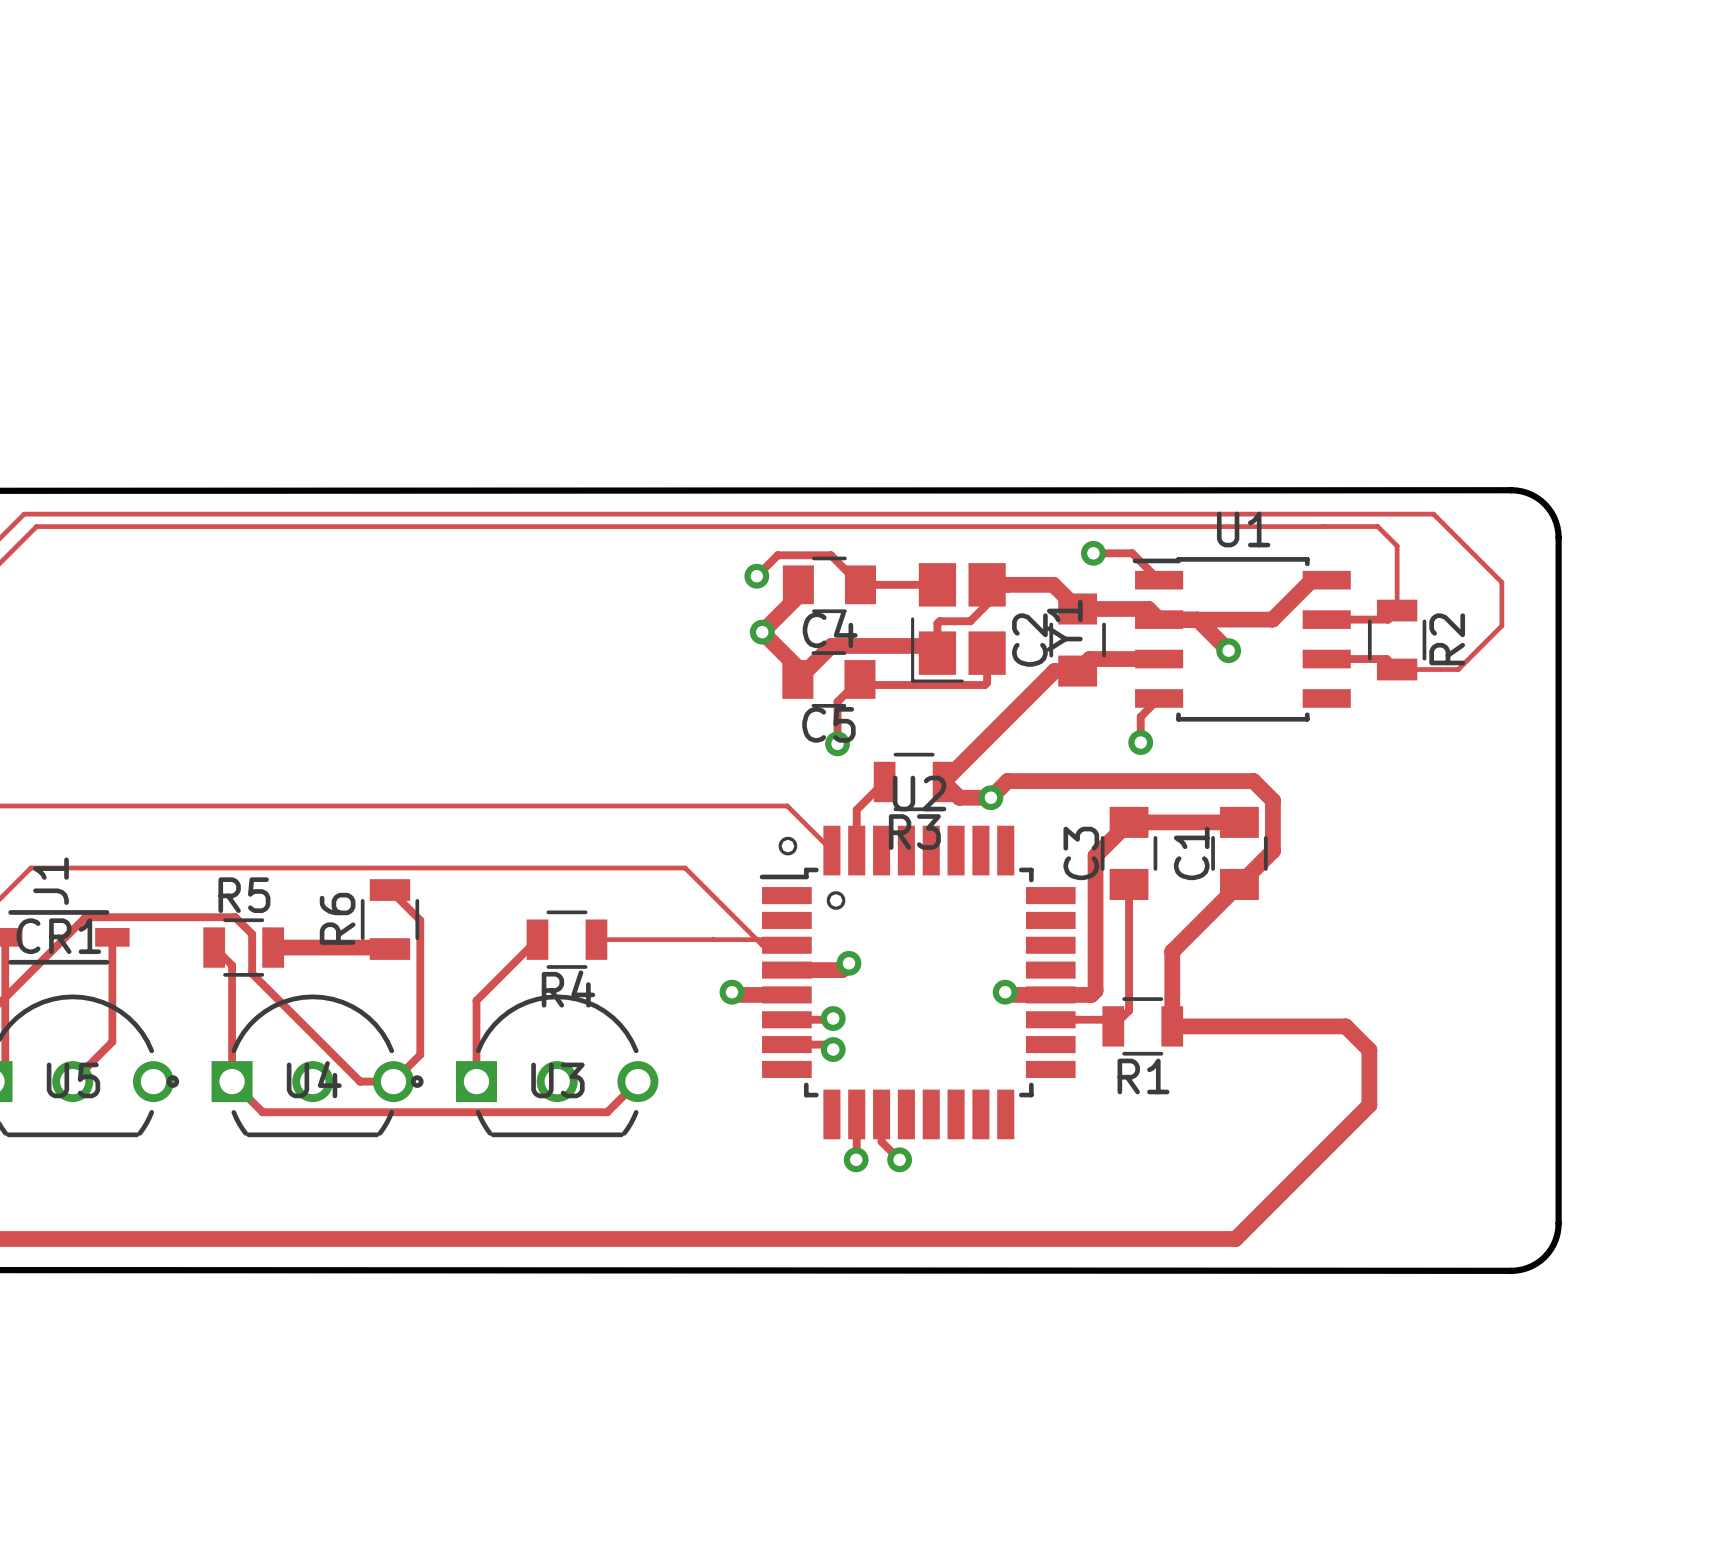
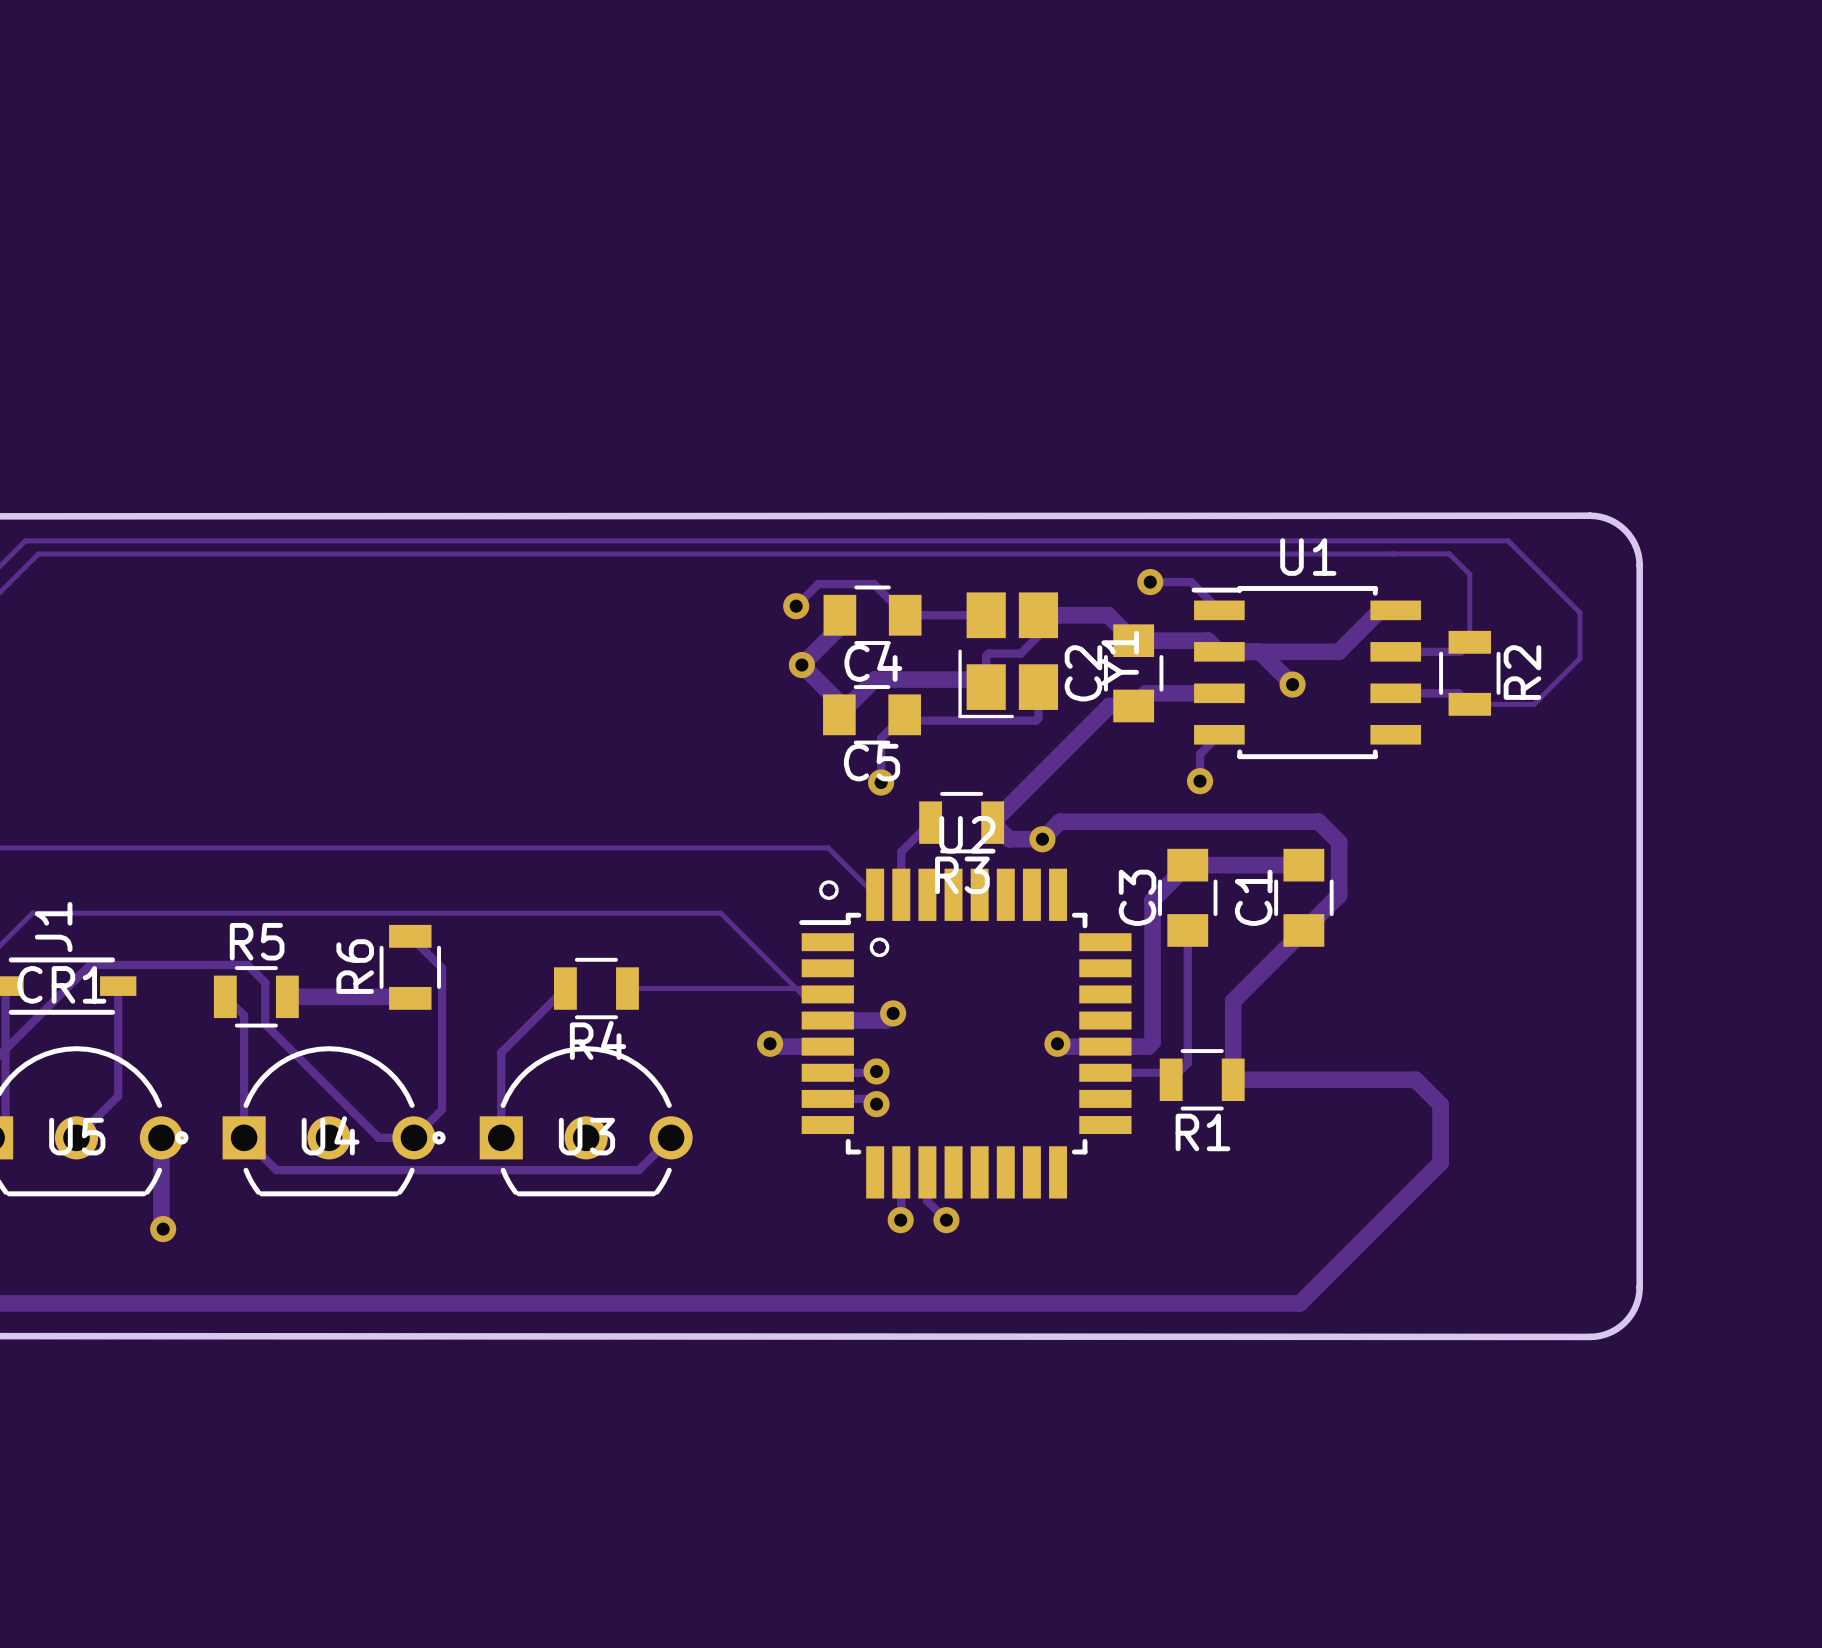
track: none -> (161, 1137) (161, 1227) (163, 1229)
via: none -> (163, 1229)

